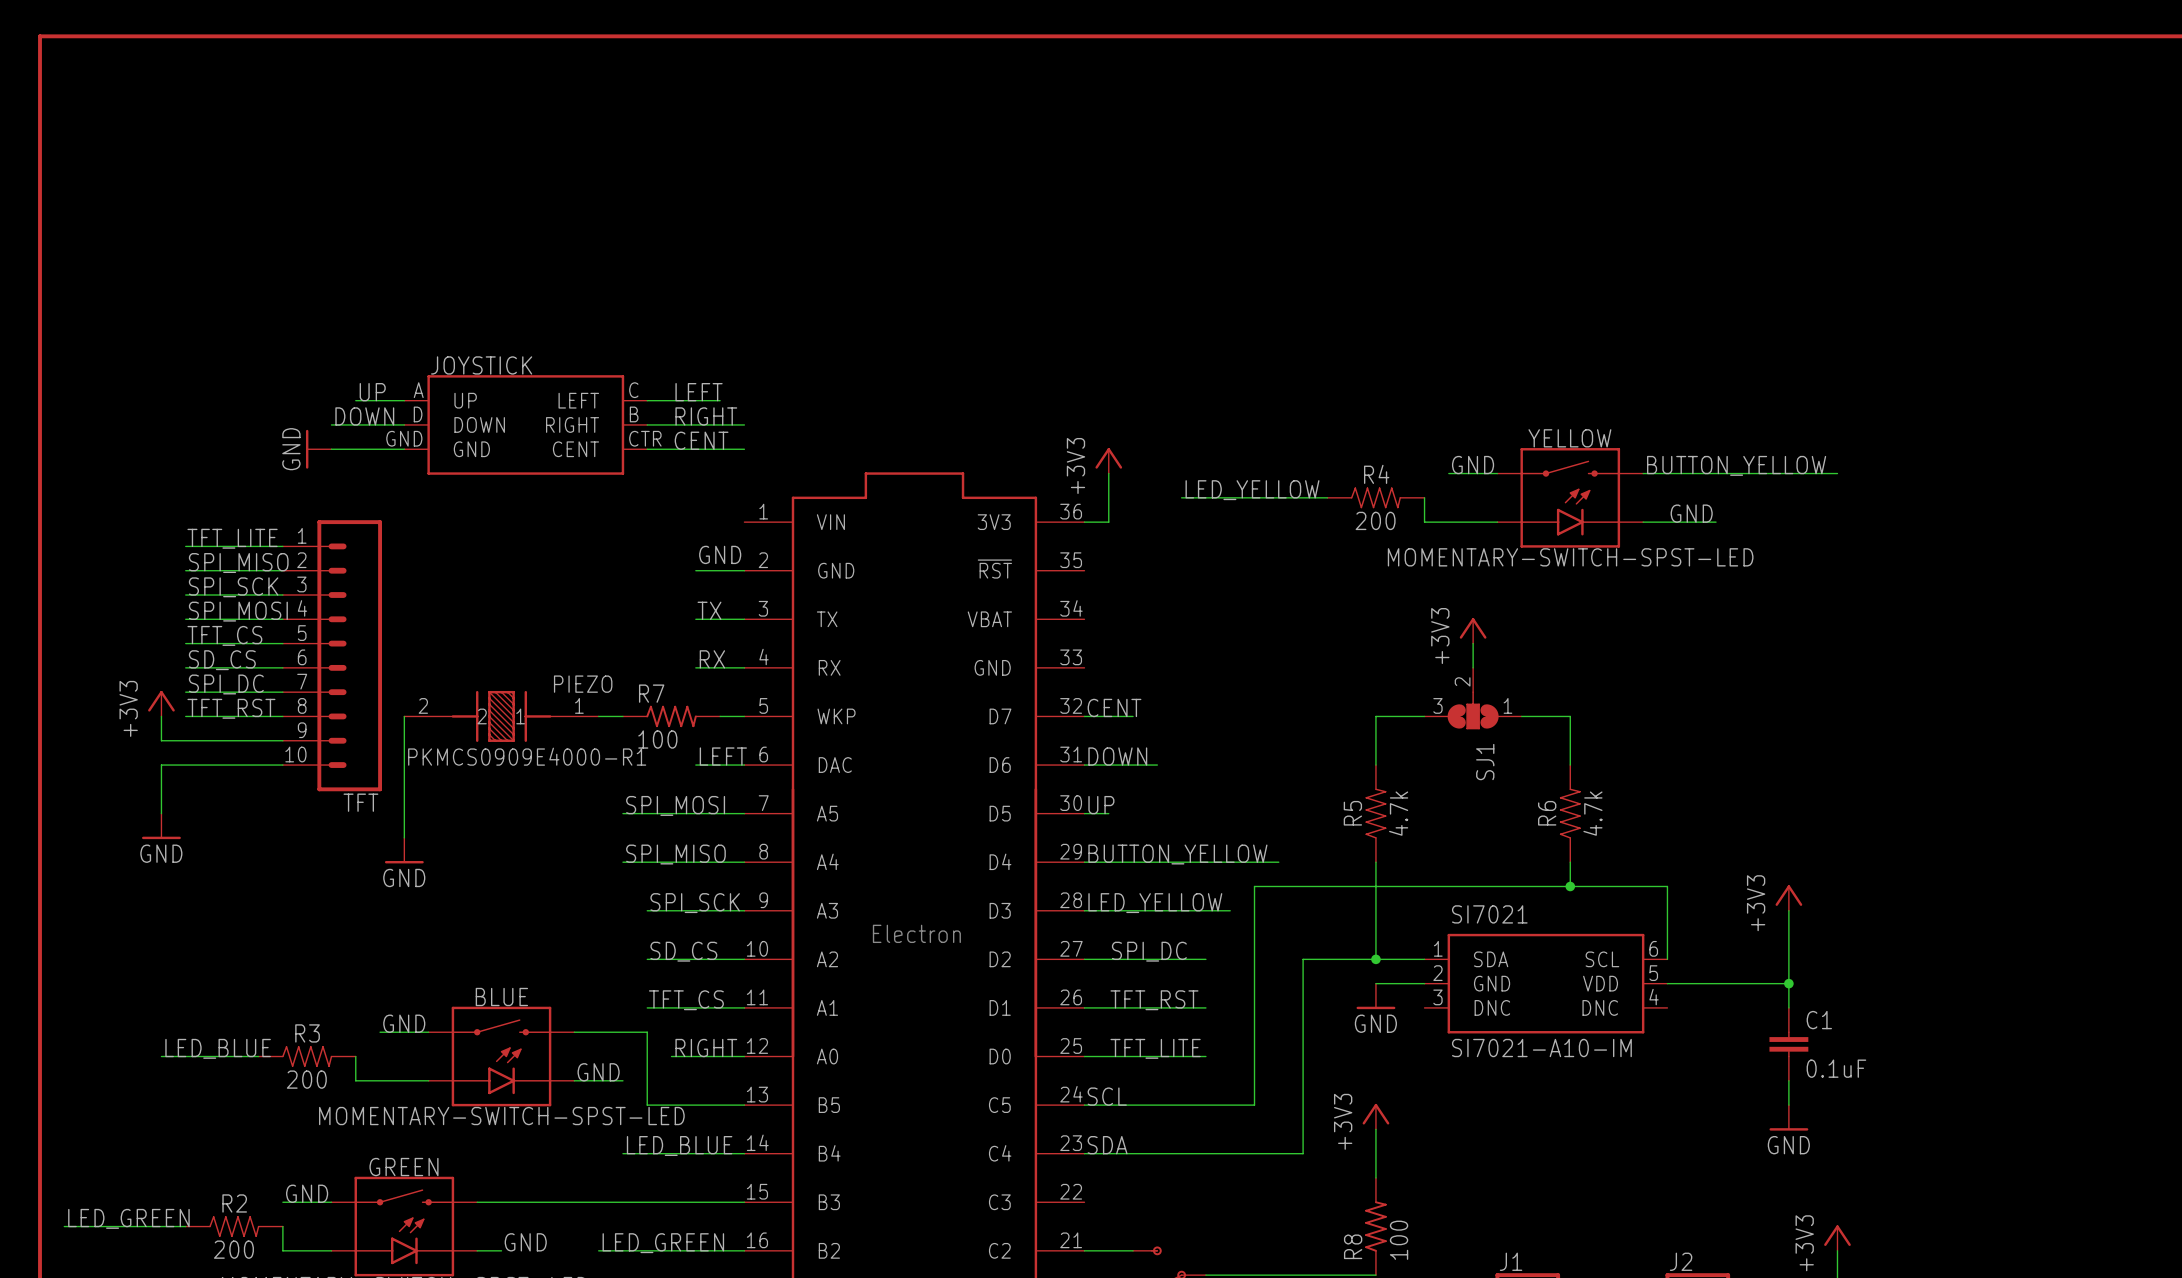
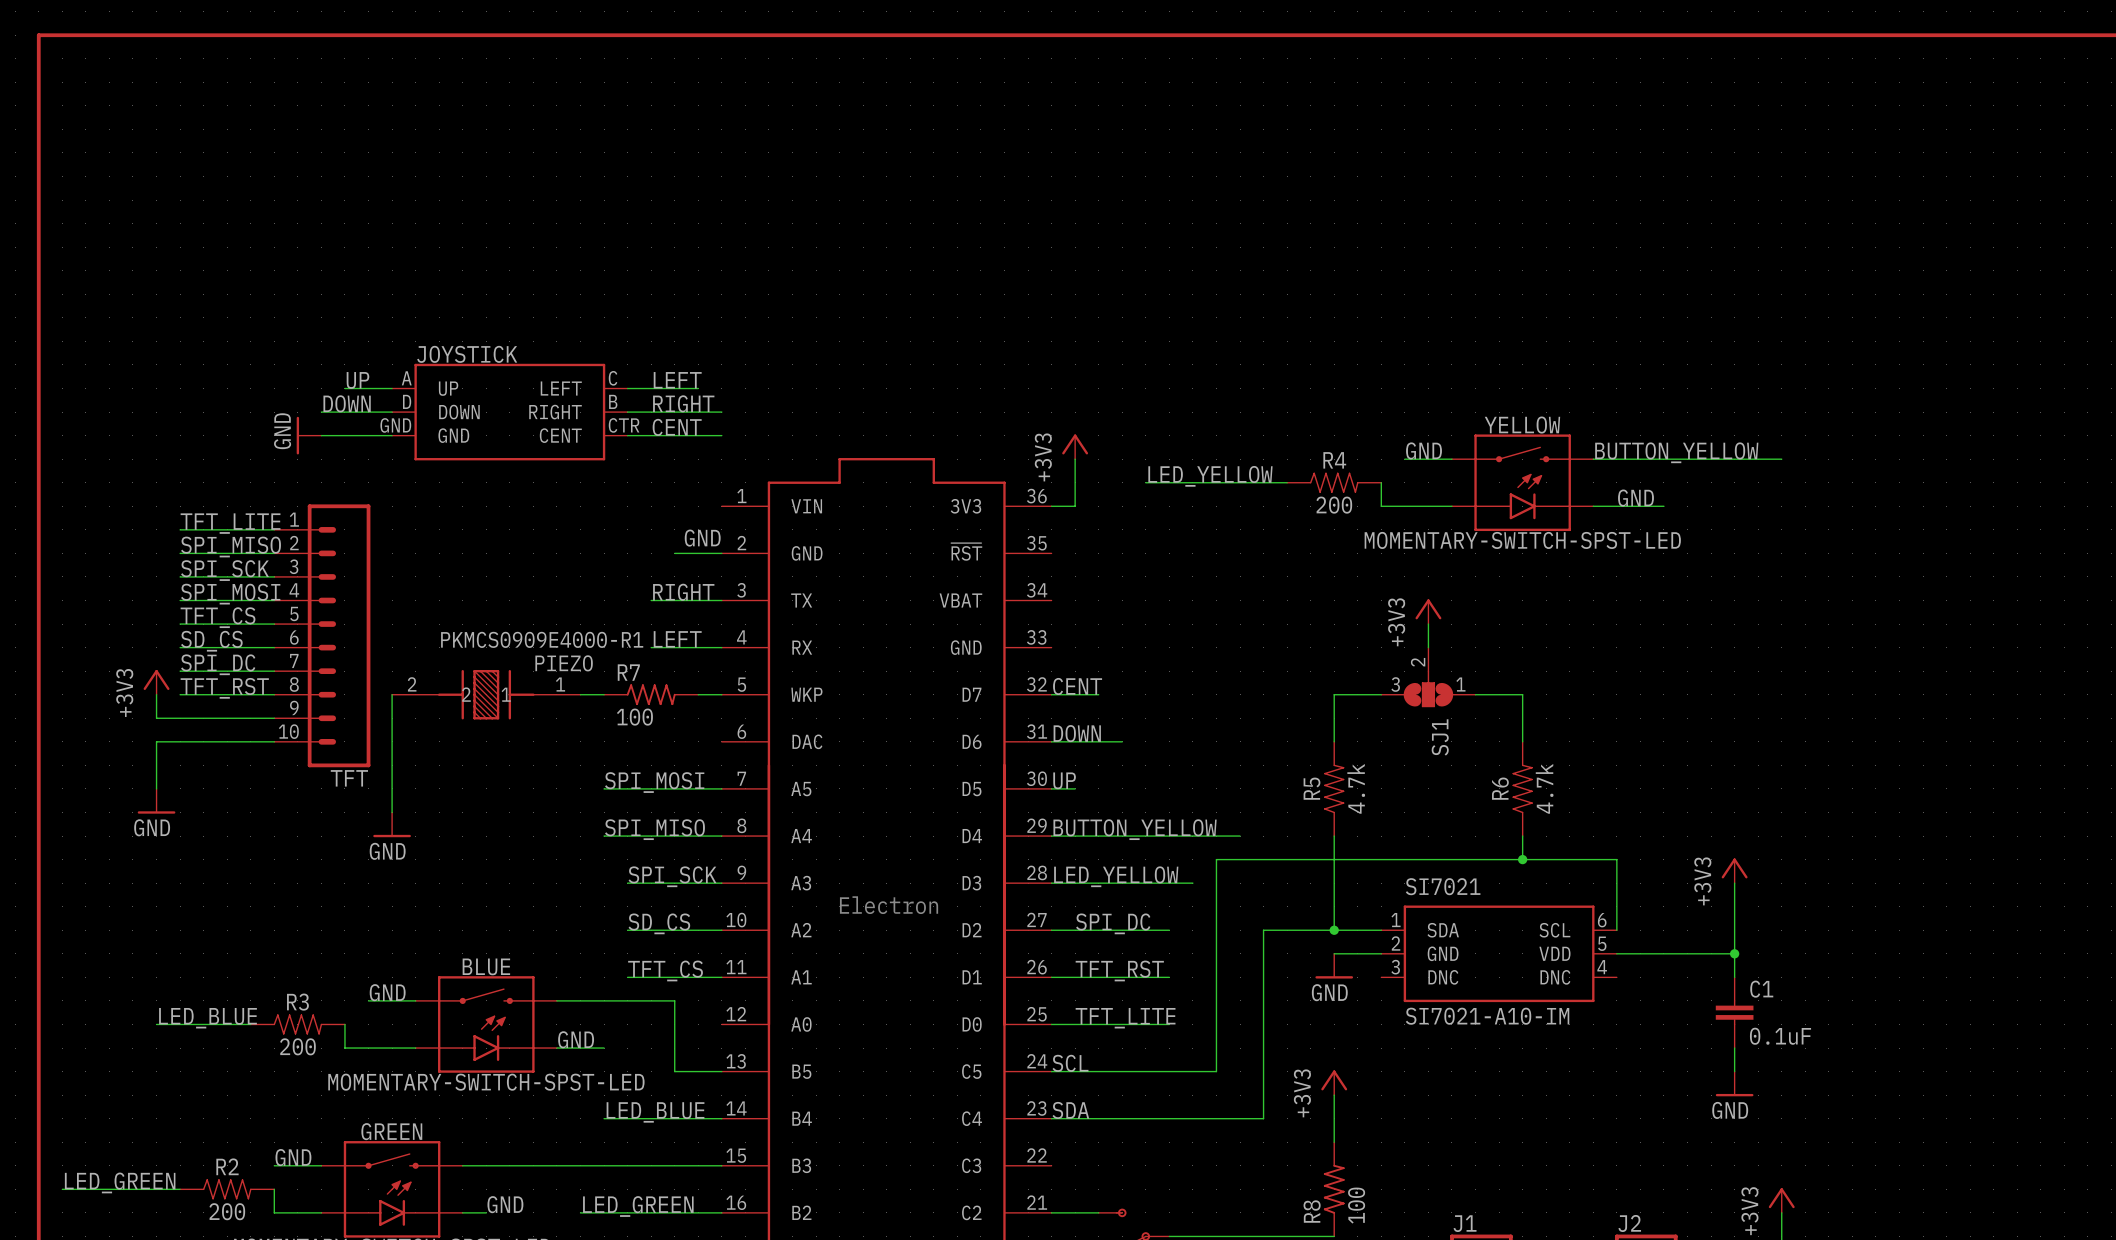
label: none -> RIGHT (683, 592)
label: TX (709, 610) -> none
wire: none -> (651, 600) (674, 600)
label: RX (712, 659) -> none
wire: none -> (651, 647) (674, 647)
PIEZO value position: PKMCS0909E4000-R1 (527, 756) -> PKMCS0909E4000-R1 (542, 639)
label position: LEFT (723, 756) -> LEFT (677, 639)
wire: (695, 765) (744, 765) -> none
wire: (647, 1032) (647, 1105) (695, 1105) -> (627, 1000) (674, 1000) (674, 1071)
label: RIGHT (706, 1048) -> none
wire: (671, 1056) (744, 1056) -> none

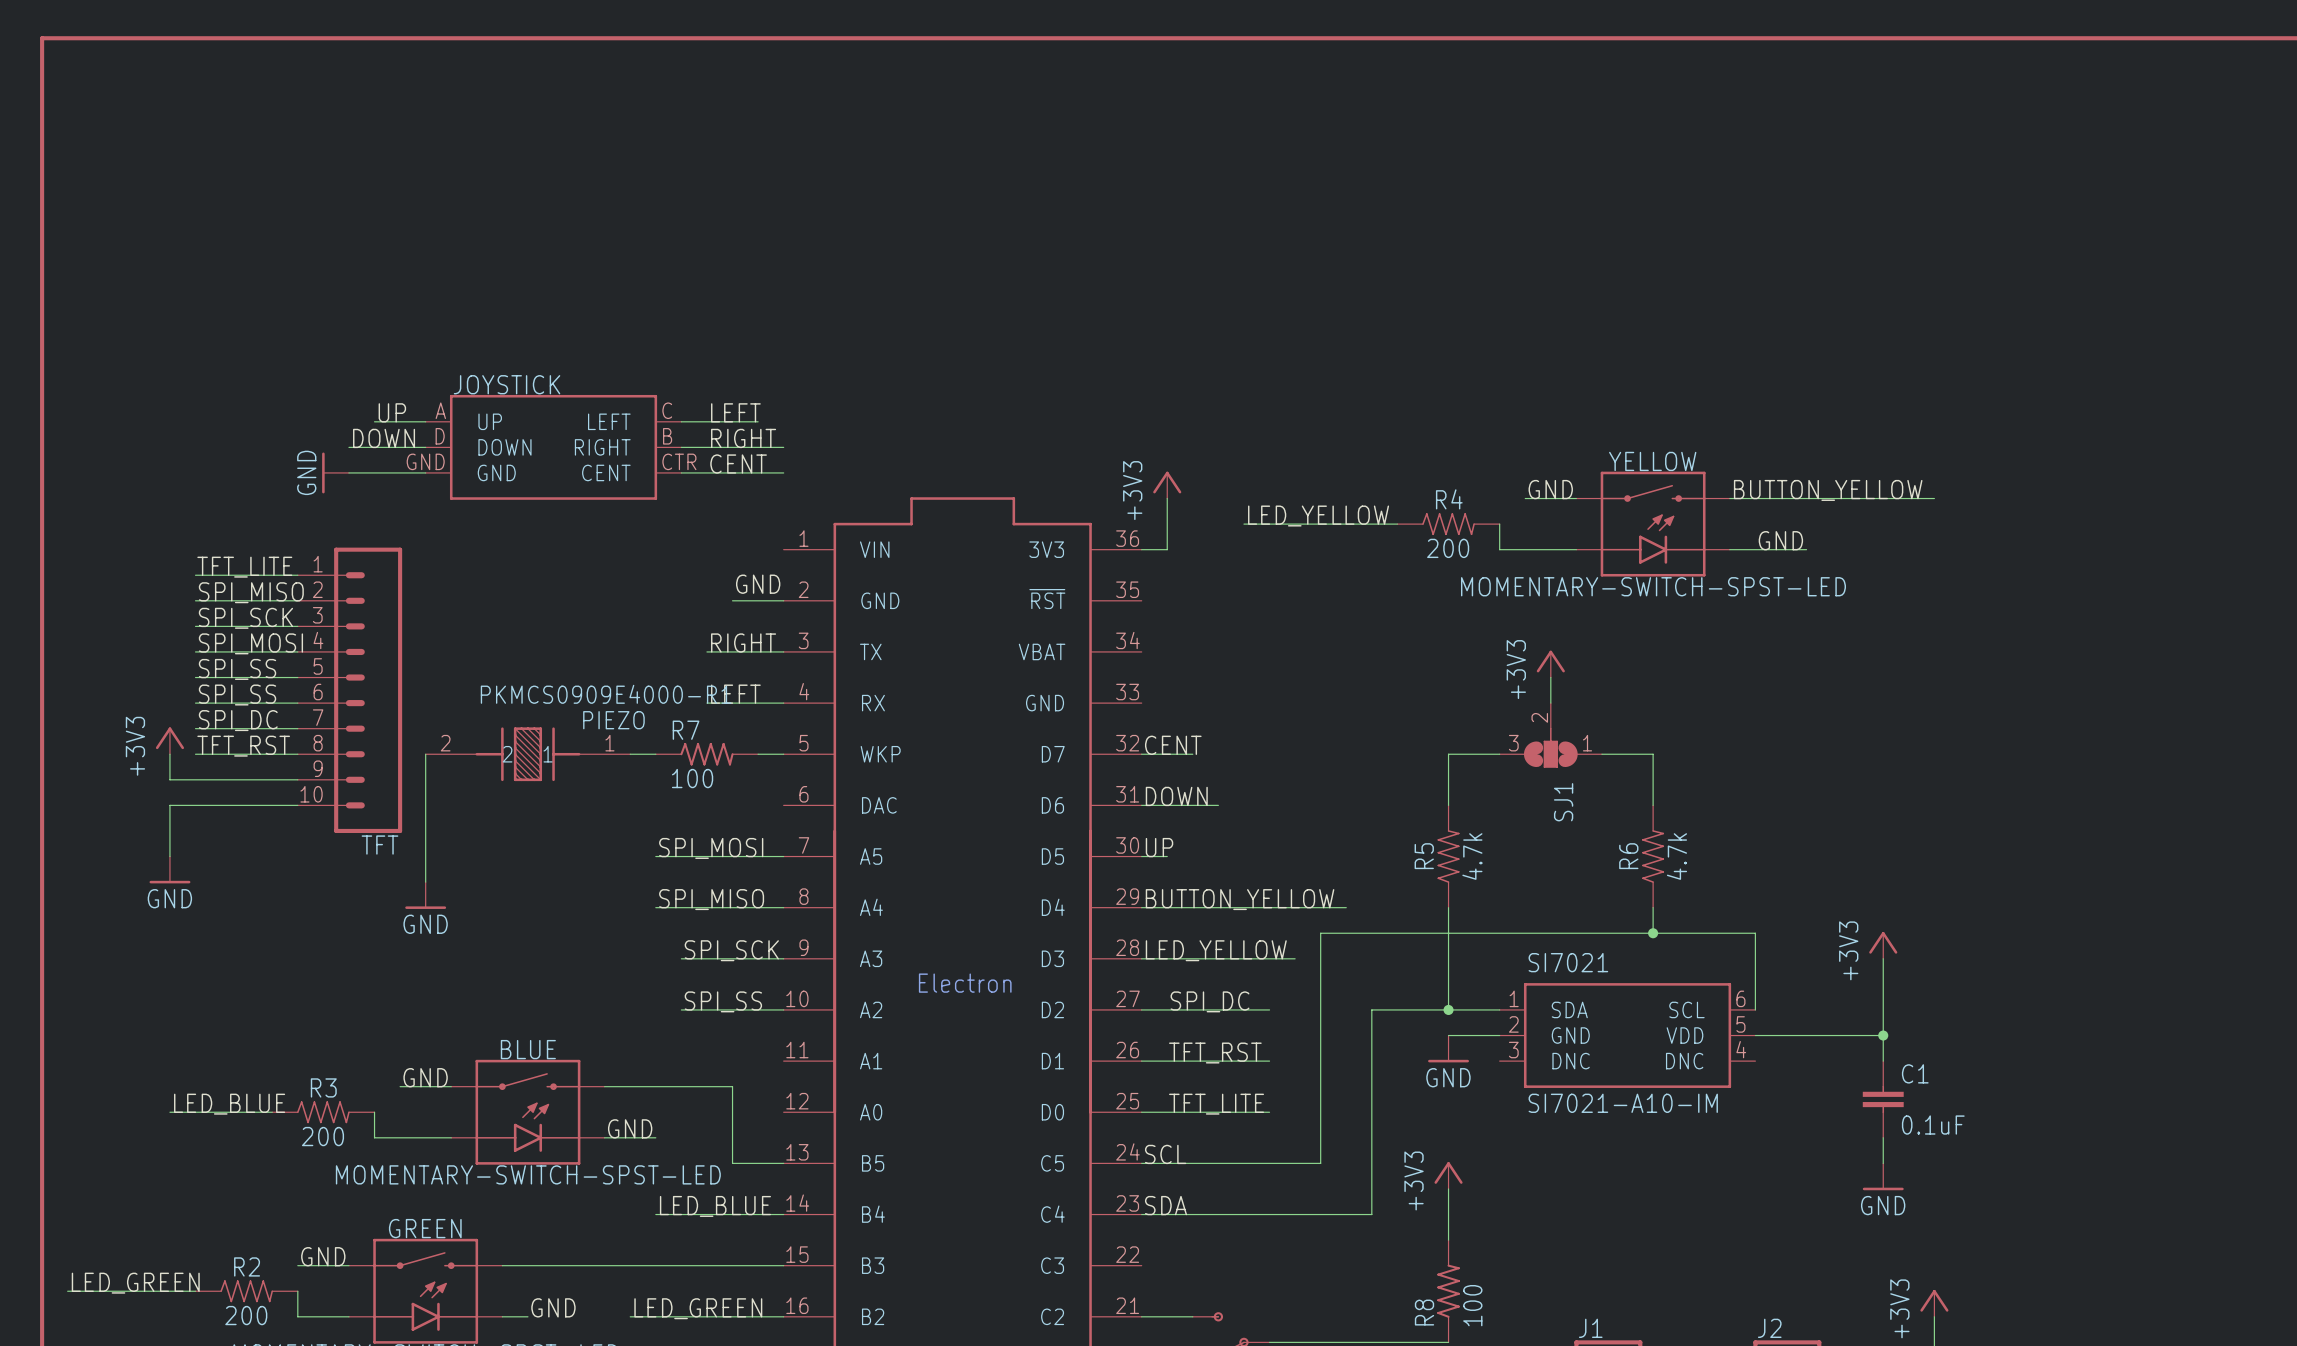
label: TFT_CS (218, 617) -> SPI_SS (237, 669)
label: SD_CS (211, 641) -> SPI_SS (237, 695)
label: SD_CS (659, 923) -> SPI_SS (723, 1001)
label: TFT_CS (665, 970) -> none
wire: (627, 977) (721, 977) -> none

